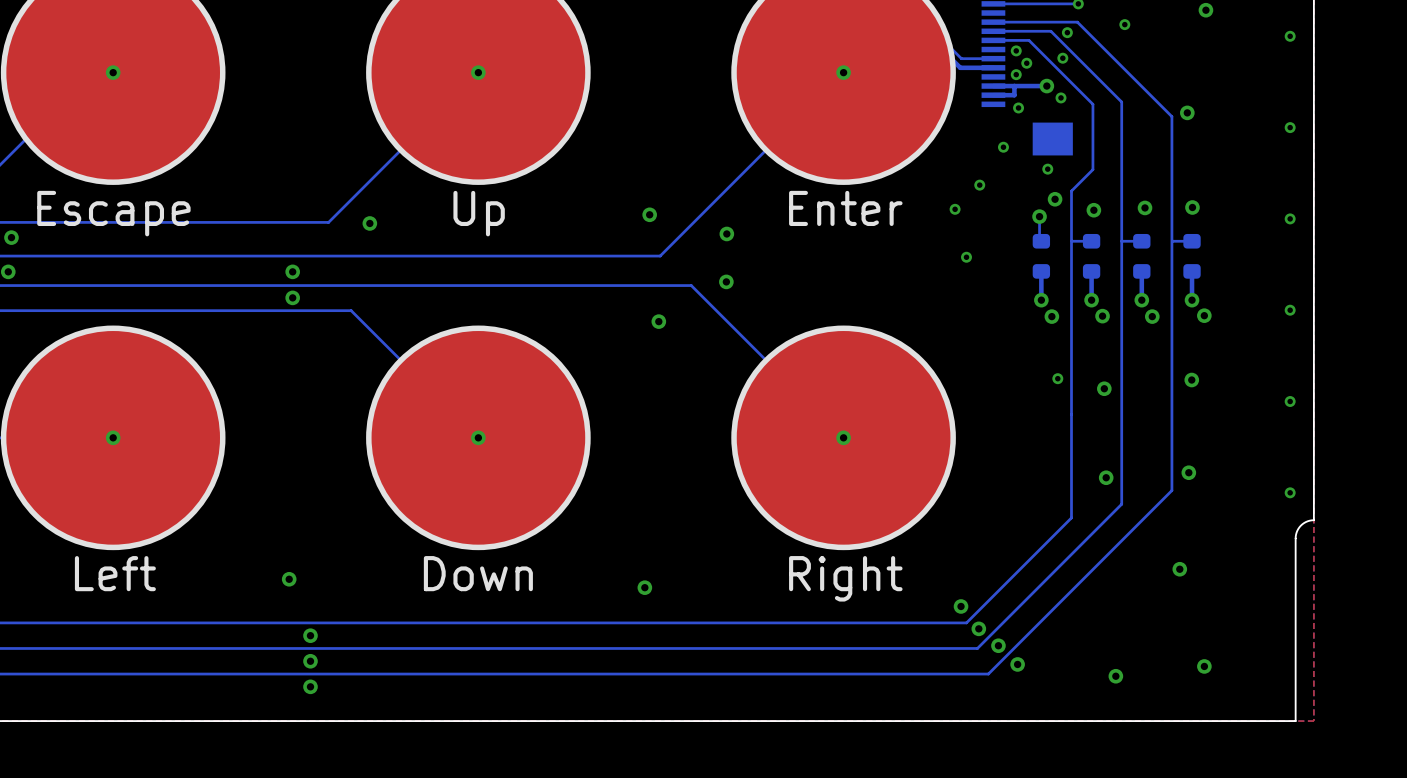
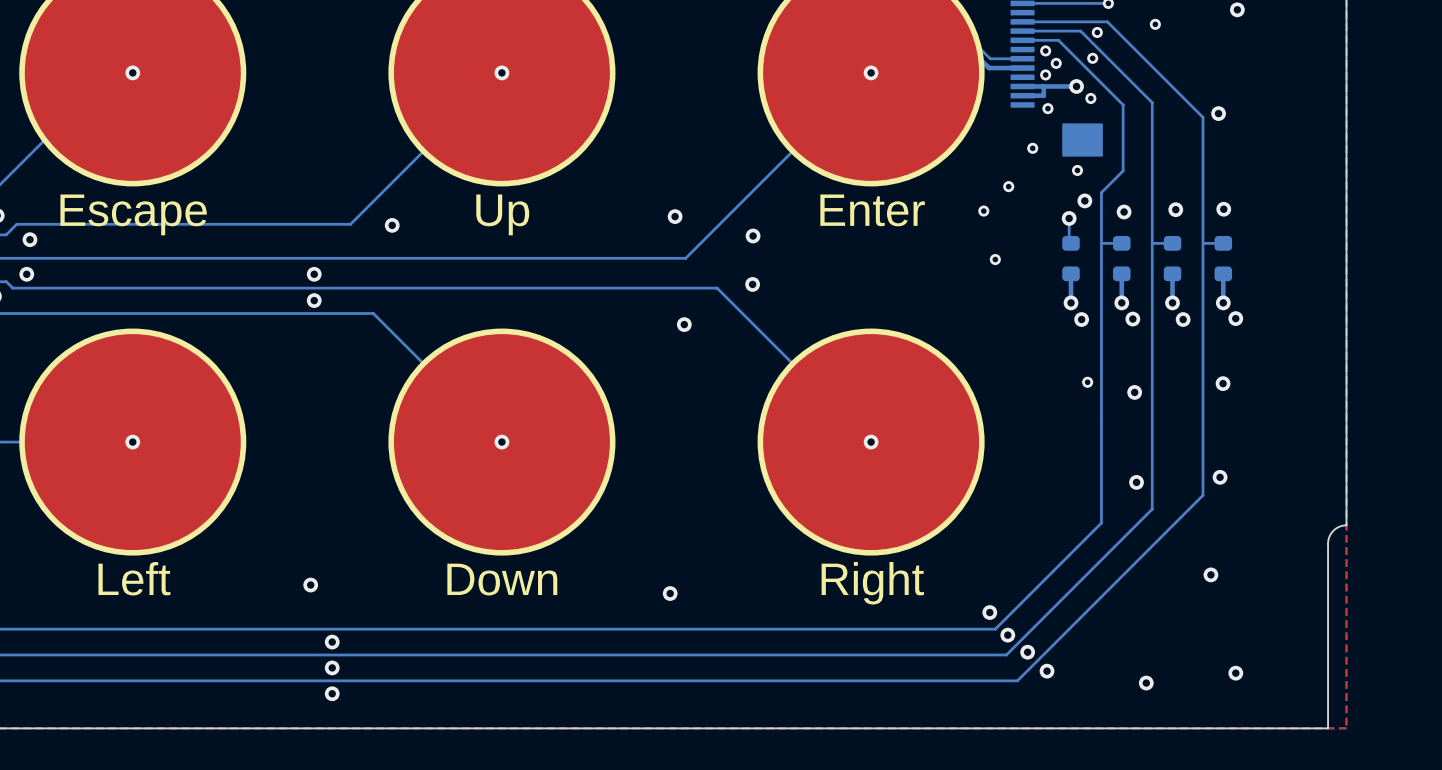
via: (1290, 36) -> none
via: (1290, 127) -> none
via: (1290, 218) -> none
via: (1290, 310) -> none
via: (1290, 401) -> none
via: (1290, 492) -> none

